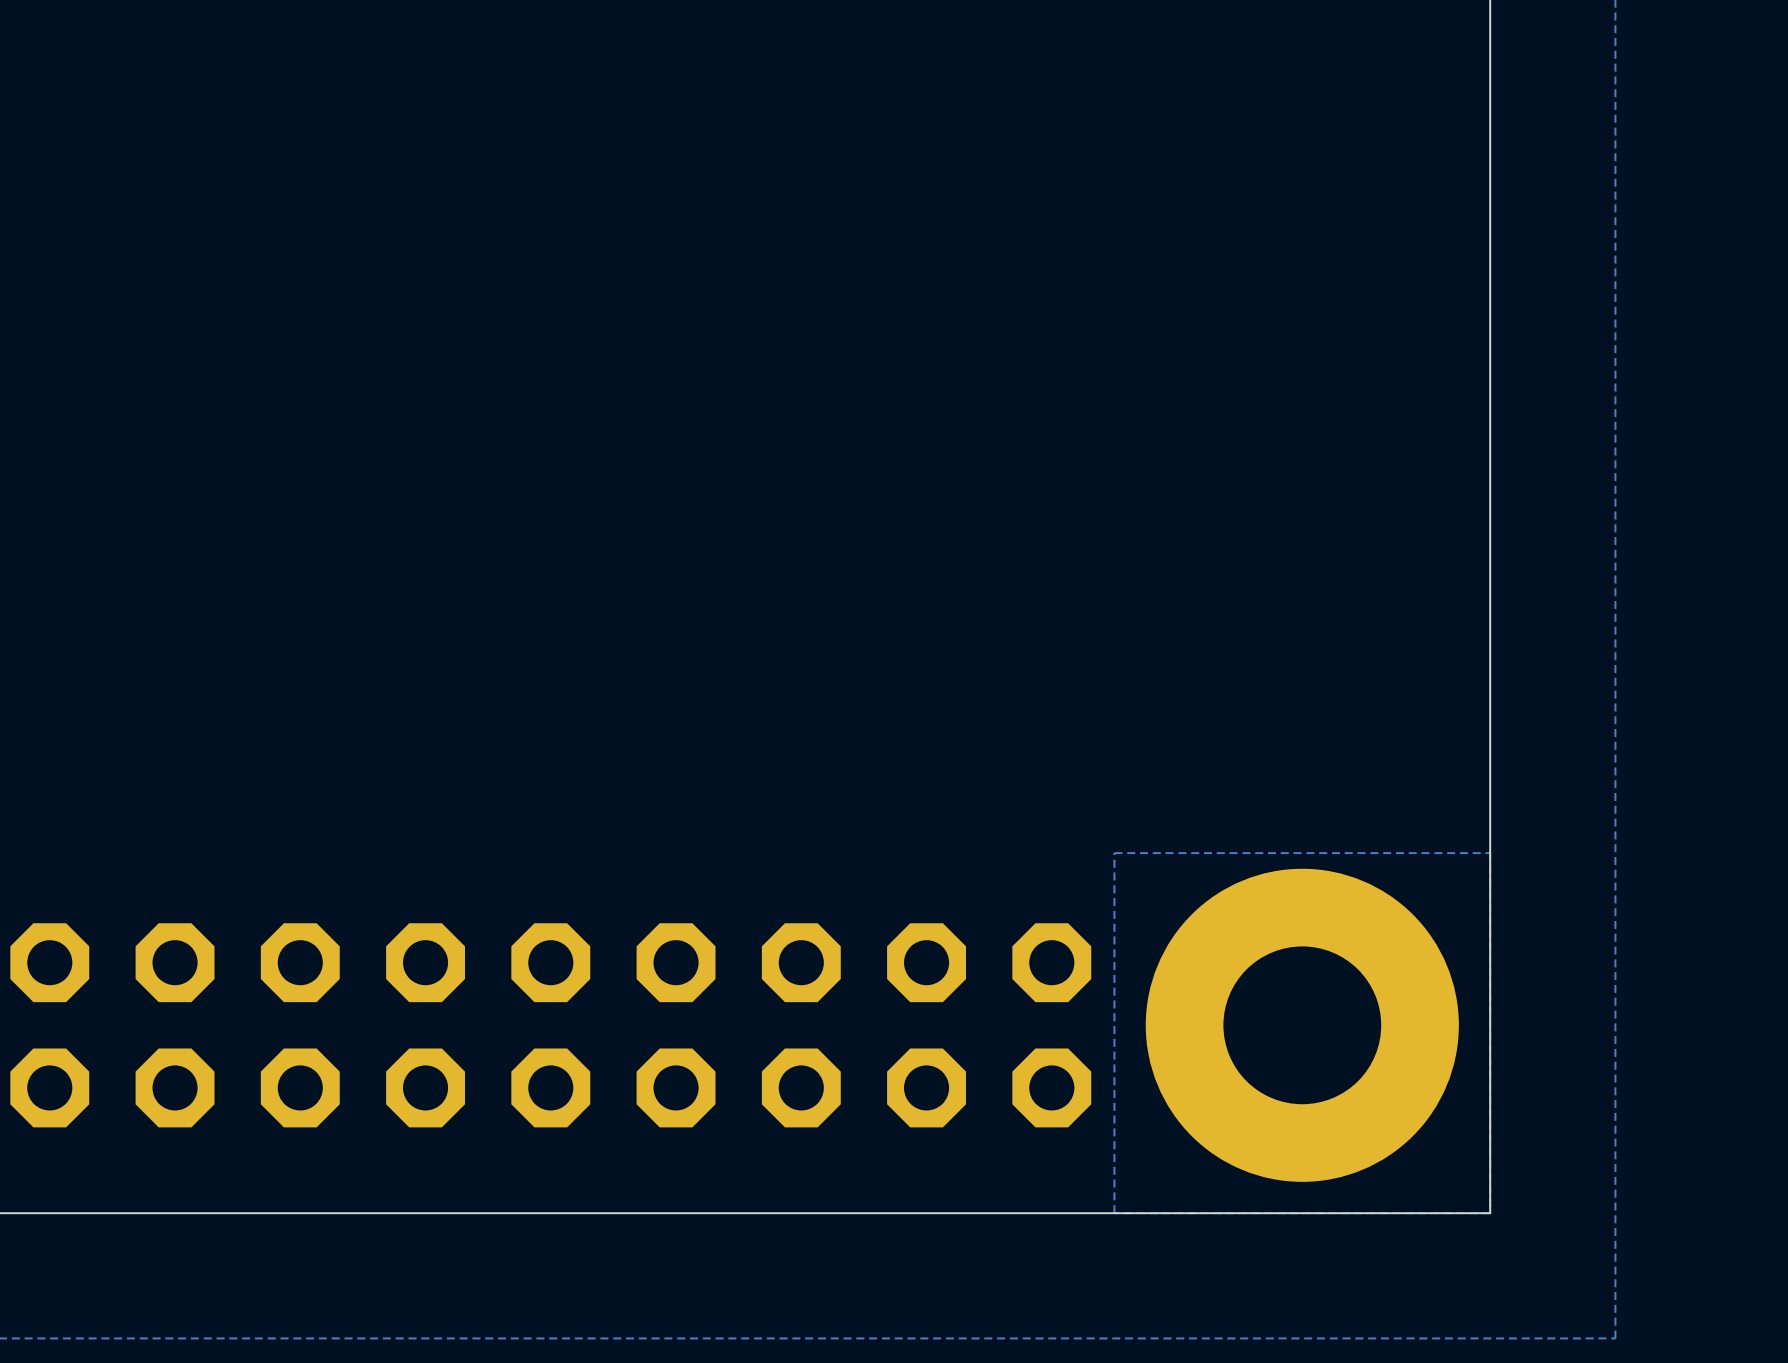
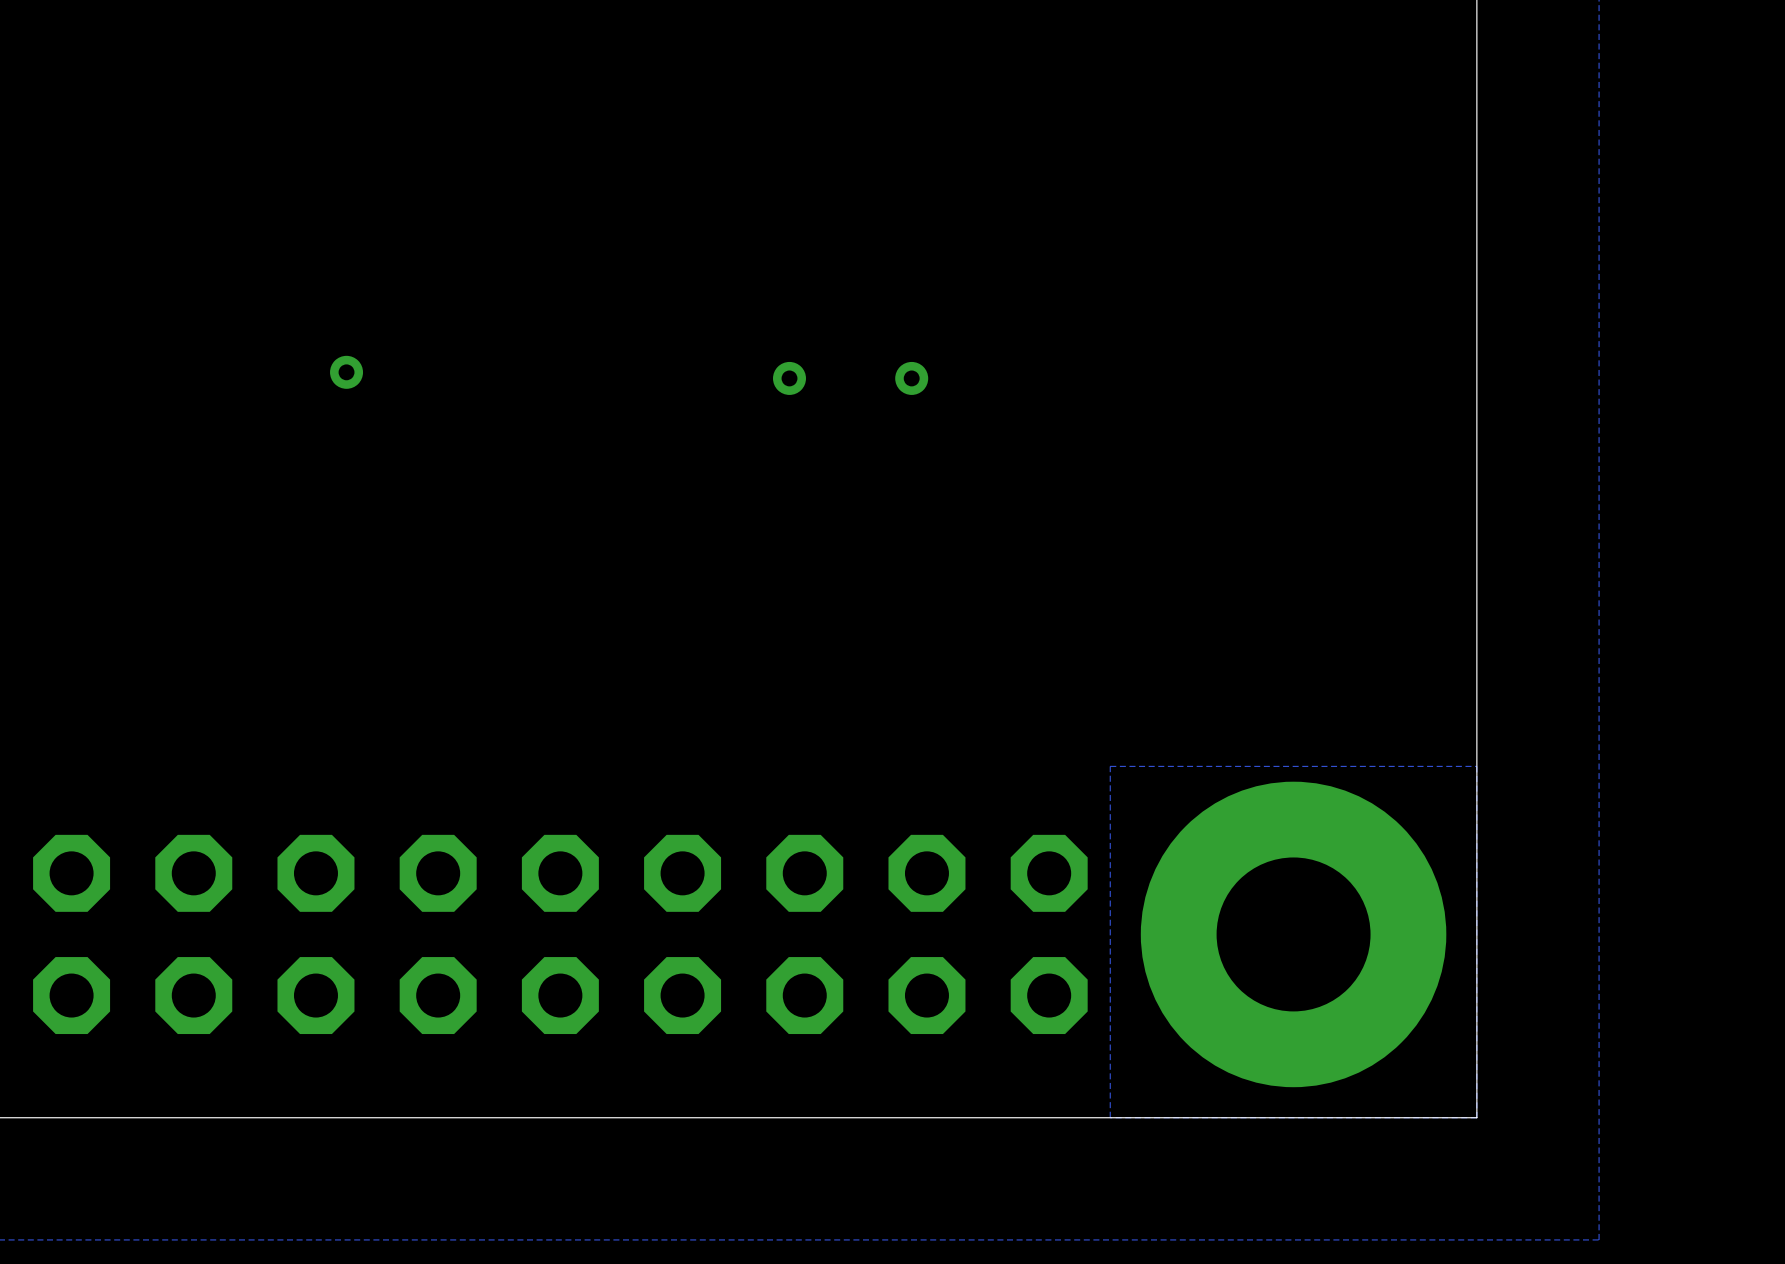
via: none -> (346, 372)
via: none -> (789, 378)
via: none -> (911, 378)

